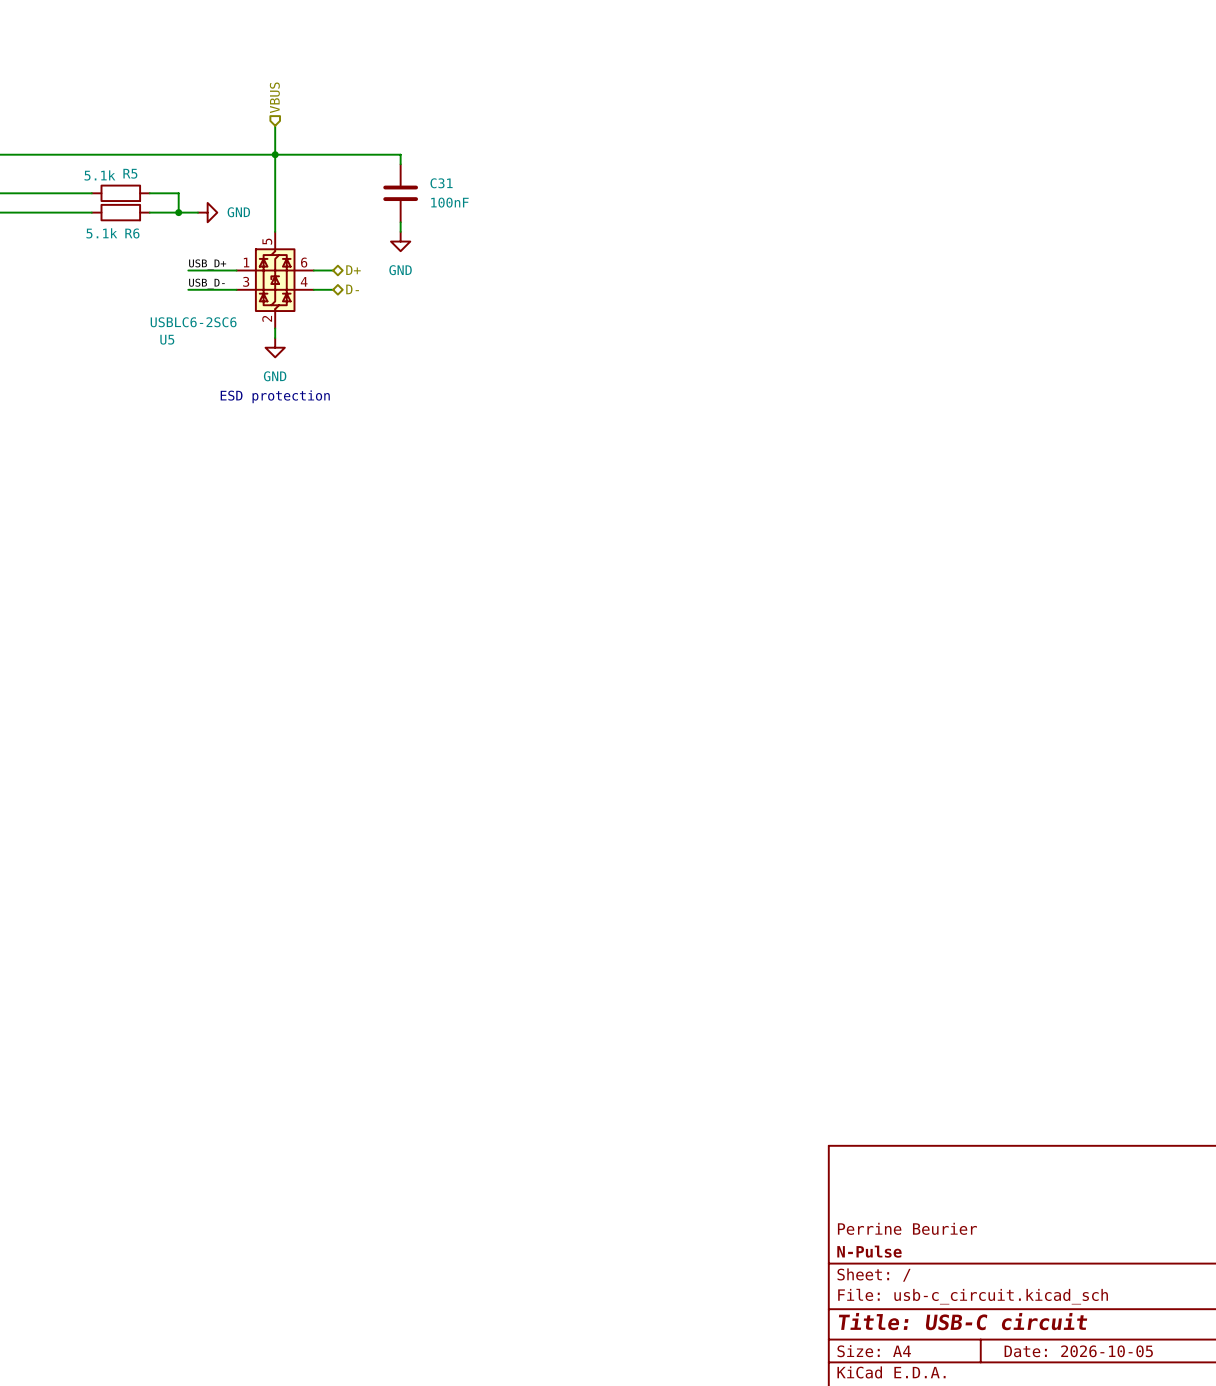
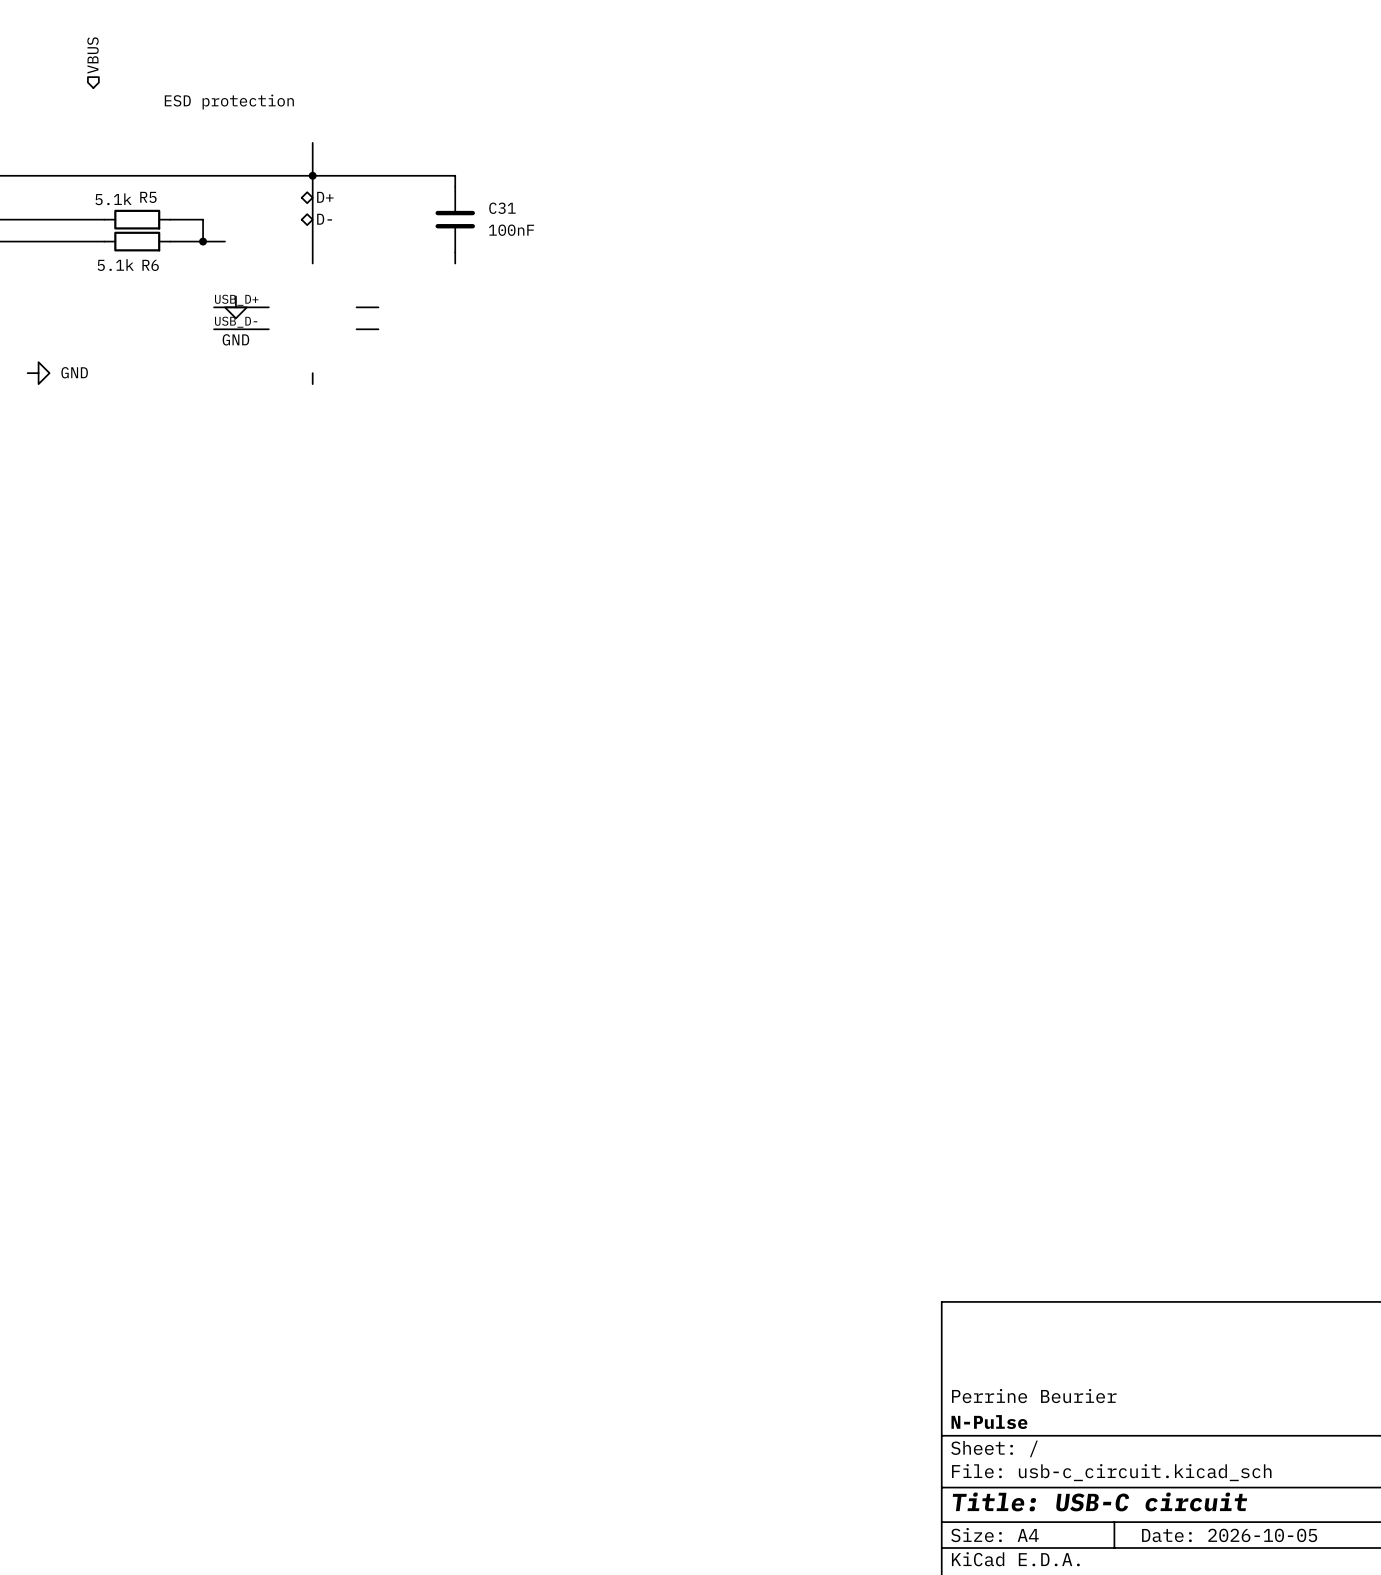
hierarchical label: none -> VBUS (92, 55)
text: none -> ESD protection (229, 102)
hierarchical label: VBUS (274, 97) -> none
power symbol: GND (207, 212) -> none
power symbol: GND (400, 241) -> none
power symbol: none -> GND (235, 307)
hierarchical label position: D+ (353, 270) -> D+ (325, 197)
U5: USBLC6-2SC6 (275, 280) -> none
hierarchical label position: D- (352, 289) -> D- (324, 219)
power symbol: none -> GND (38, 373)
power symbol: GND (275, 347) -> none
text: ESD protection (275, 396) -> none

